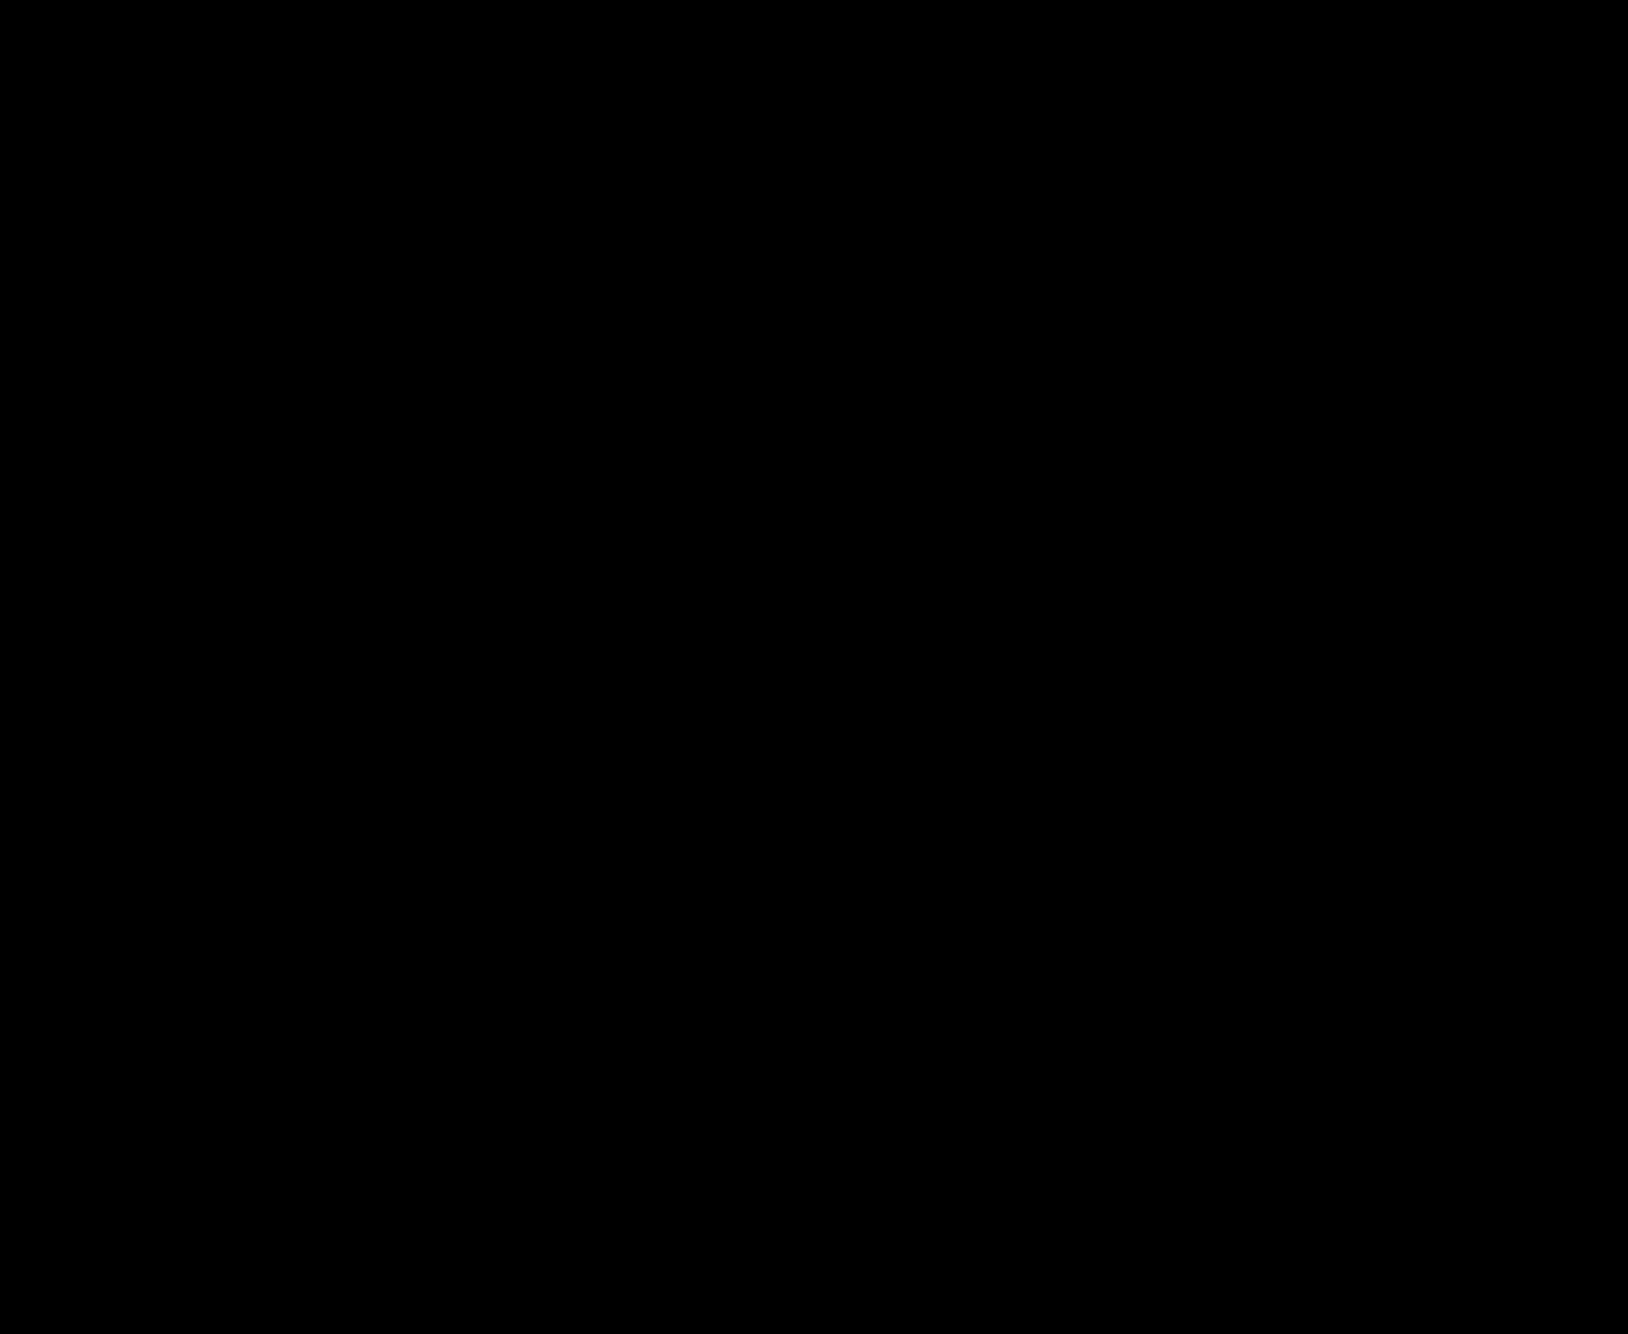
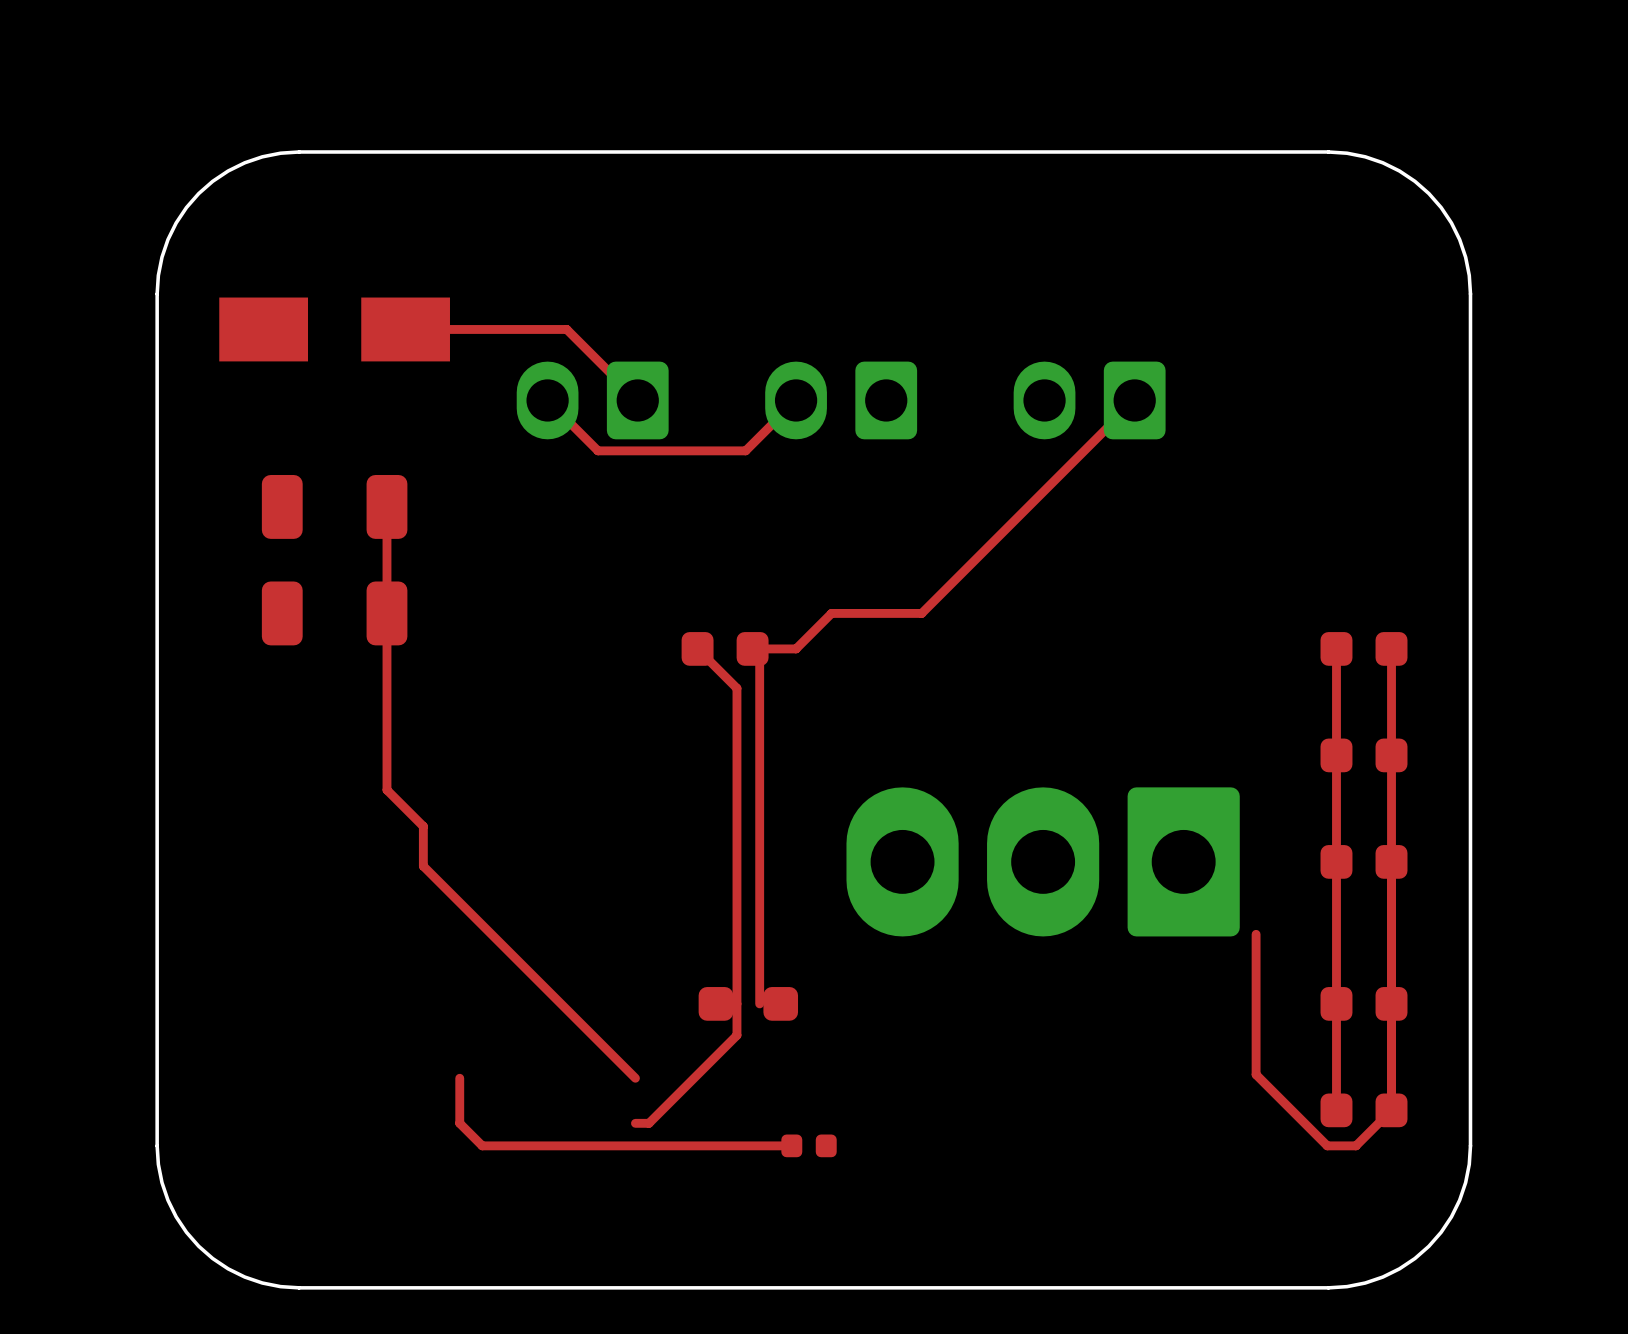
board edge: none -> (1328, 151) (299, 151) (280, 153) (244, 162) (228, 171) (198, 193) (186, 207) (167, 239) (158, 275) (157, 293) (157, 1145) (161, 1182) (167, 1200) (176, 1216) (198, 1246) (228, 1268) (244, 1277) (280, 1286) (299, 1287) (1328, 1287) (1347, 1286) (1382, 1277) (1399, 1268) (1428, 1246) (1441, 1232) (1459, 1200) (1465, 1182) (1470, 1145) (1469, 275) (1459, 239) (1451, 222) (1441, 207) (1414, 181) (1382, 162) (1365, 156) (1328, 151)
part: none -> (334, 329)
top track: none -> (405, 329) (566, 329) (637, 400)
part: none -> (592, 400)
top track: none -> (796, 400) (745, 450) (598, 450) (547, 400)
part: none -> (841, 400)
part: none -> (1089, 400)
top track: none -> (1143, 400) (1134, 400) (921, 613) (831, 613) (796, 648) (752, 648) (759, 656) (759, 1003)
top track: none -> (386, 489) (386, 790) (423, 826) (423, 866) (635, 1078)
part: none -> (334, 506)
part: none -> (334, 613)
top track: none -> (697, 648) (736, 688) (736, 1035) (648, 1123) (635, 1123)
part: none -> (725, 648)
top track: none -> (1336, 648) (1336, 1110)
part: none -> (1364, 648)
top track: none -> (1391, 648) (1391, 1110) (1356, 1145) (1327, 1145) (1256, 1074) (1256, 934)
part: none -> (1364, 755)
part: none -> (1043, 861)
part: none -> (1364, 861)
part: none -> (748, 1003)
part: none -> (1364, 1003)
top track: none -> (459, 1078) (459, 1123) (482, 1145) (791, 1145)
part: none -> (1364, 1110)
part: none -> (809, 1145)

